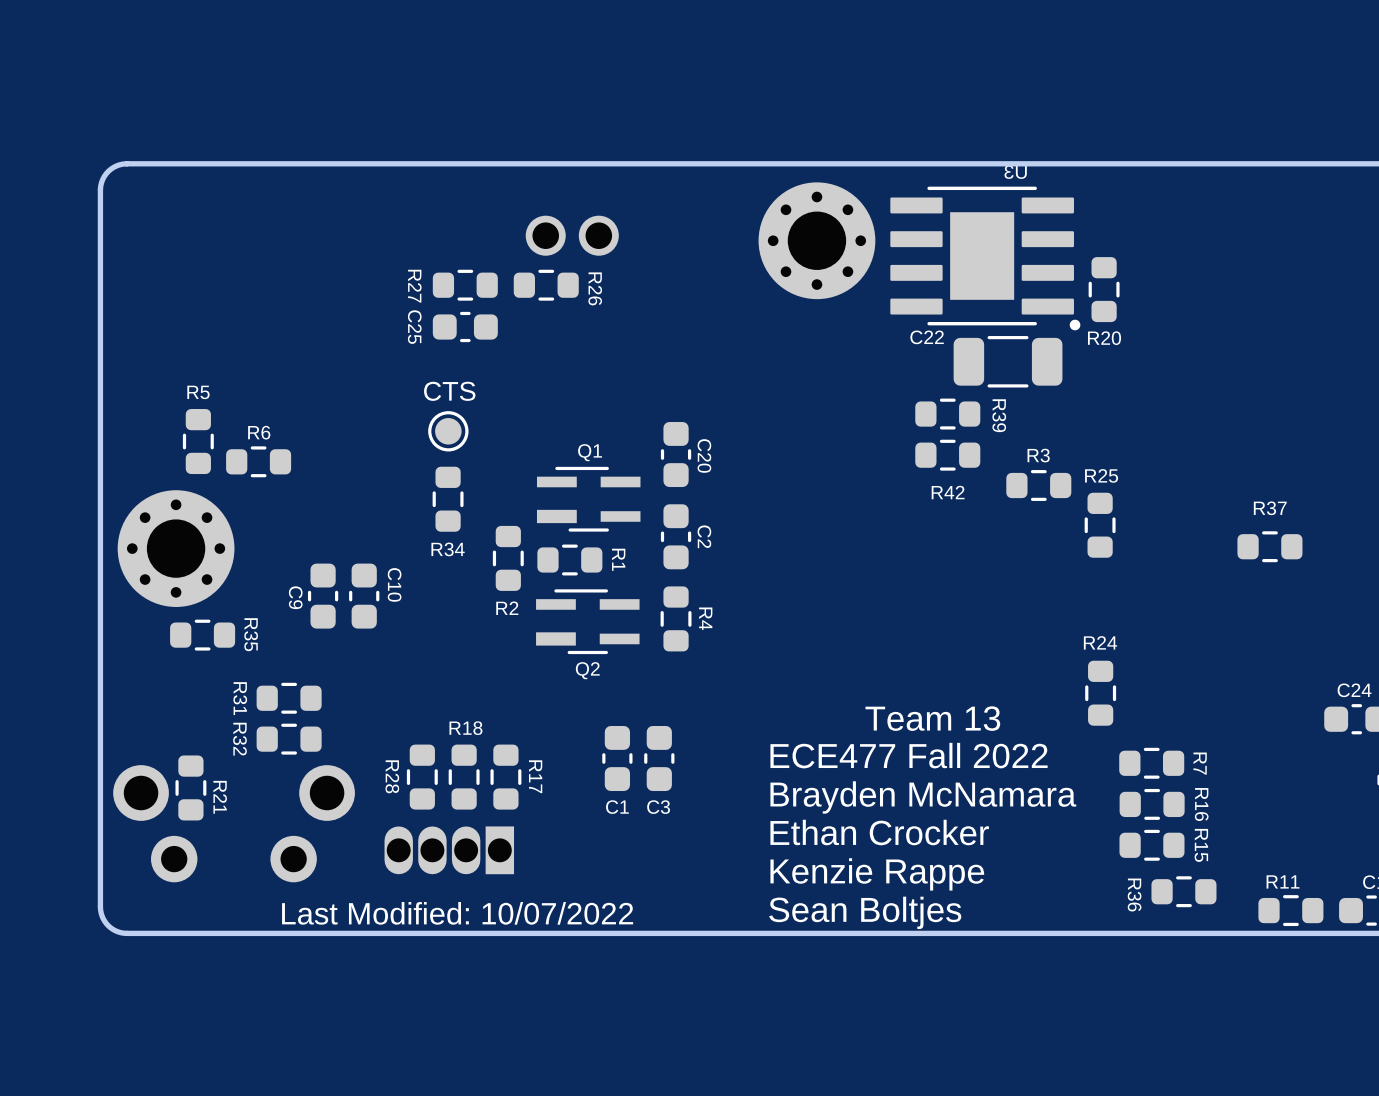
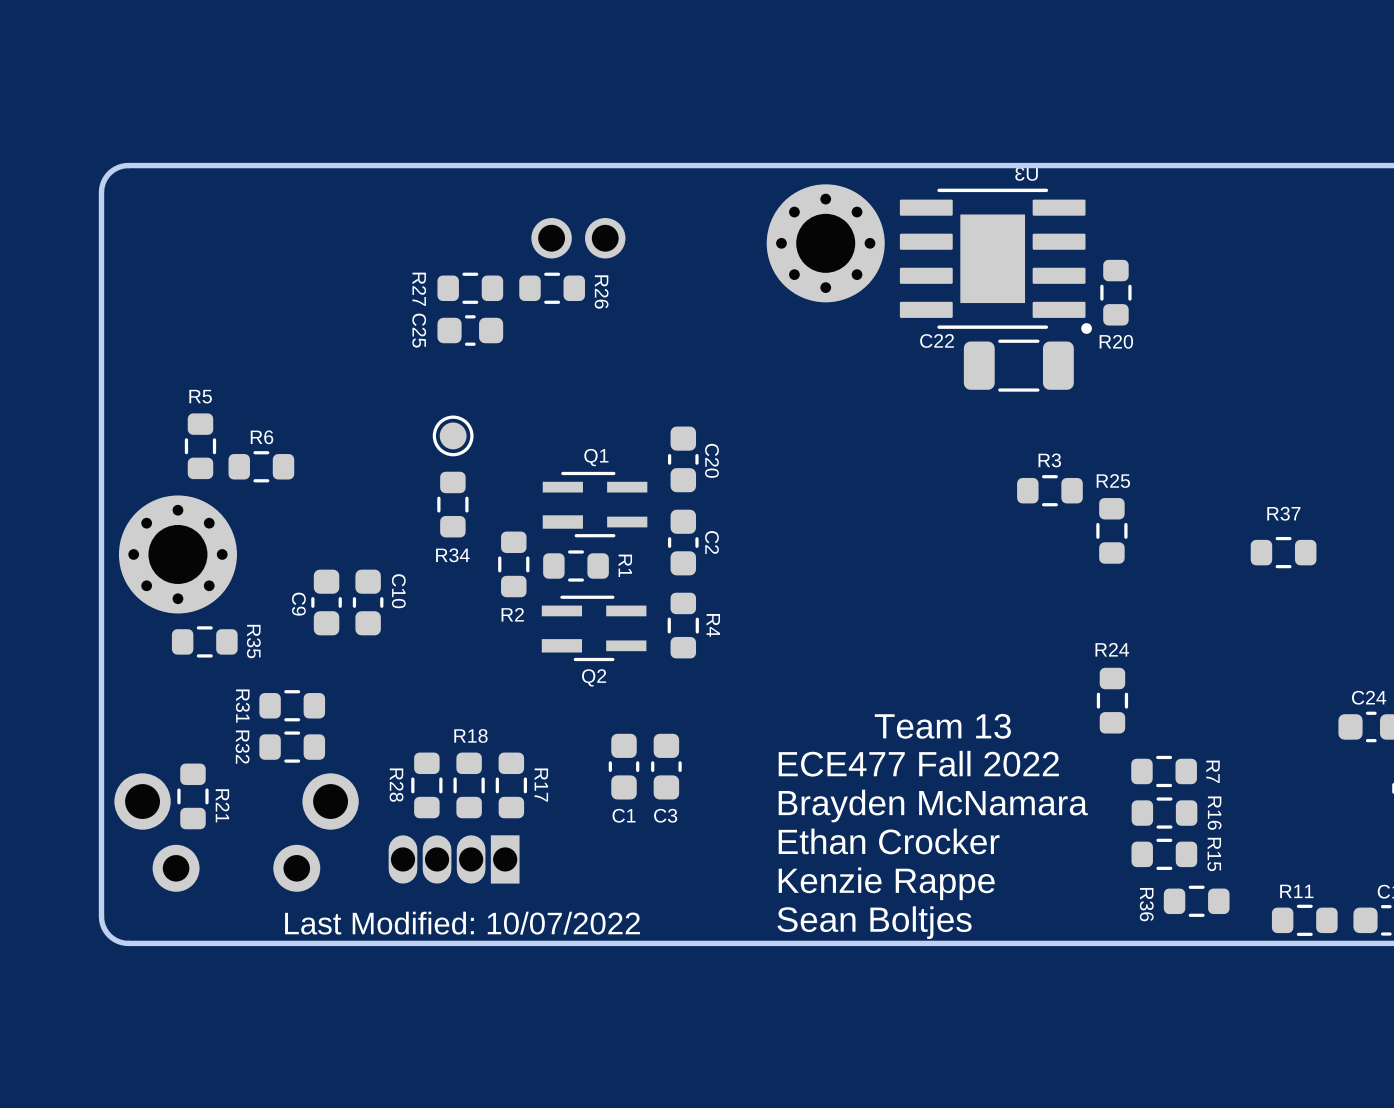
text: CTS (449, 391) -> none
R39: (947, 414) -> none
R42: (947, 455) -> none

